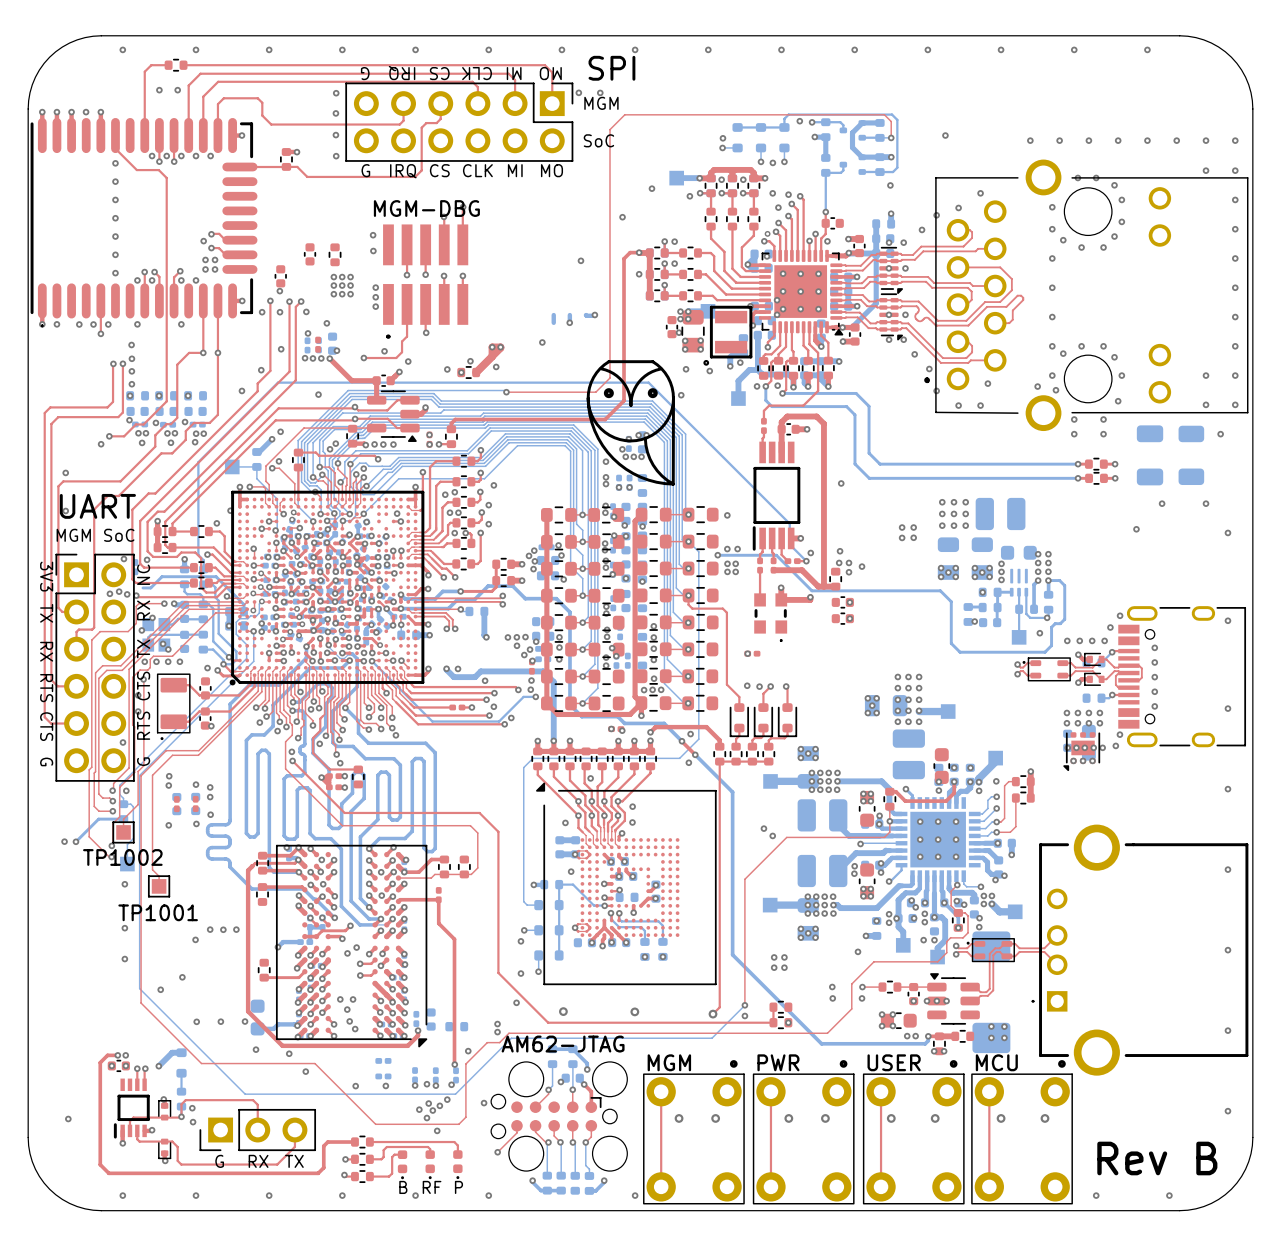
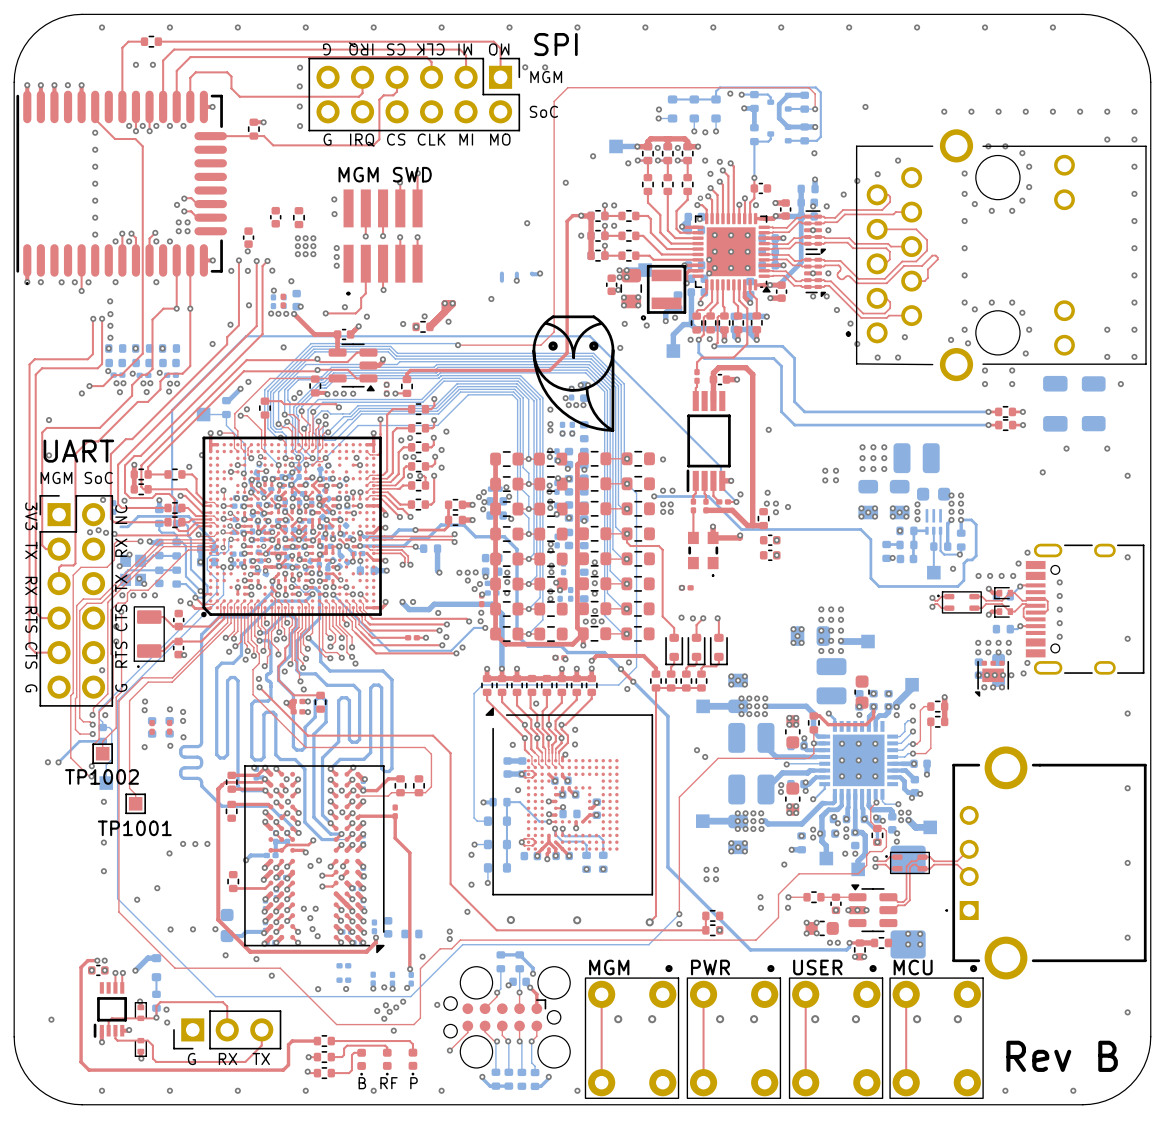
text: MGM-DBG (426, 208) -> MGM SWD (385, 174)
text: AM62-JTAG (563, 1044) -> none

